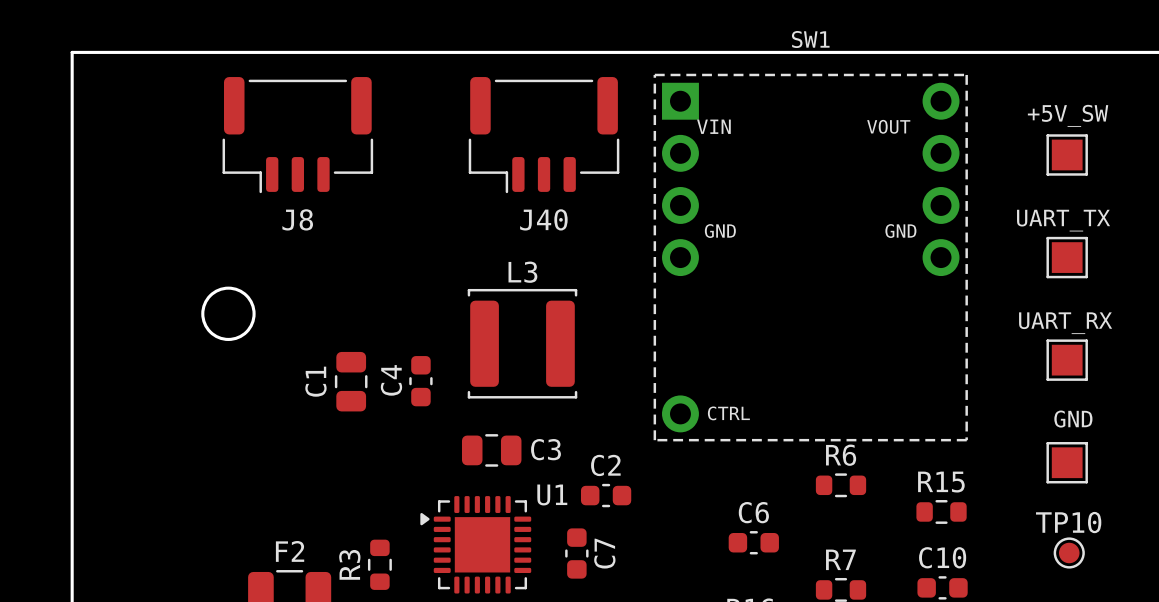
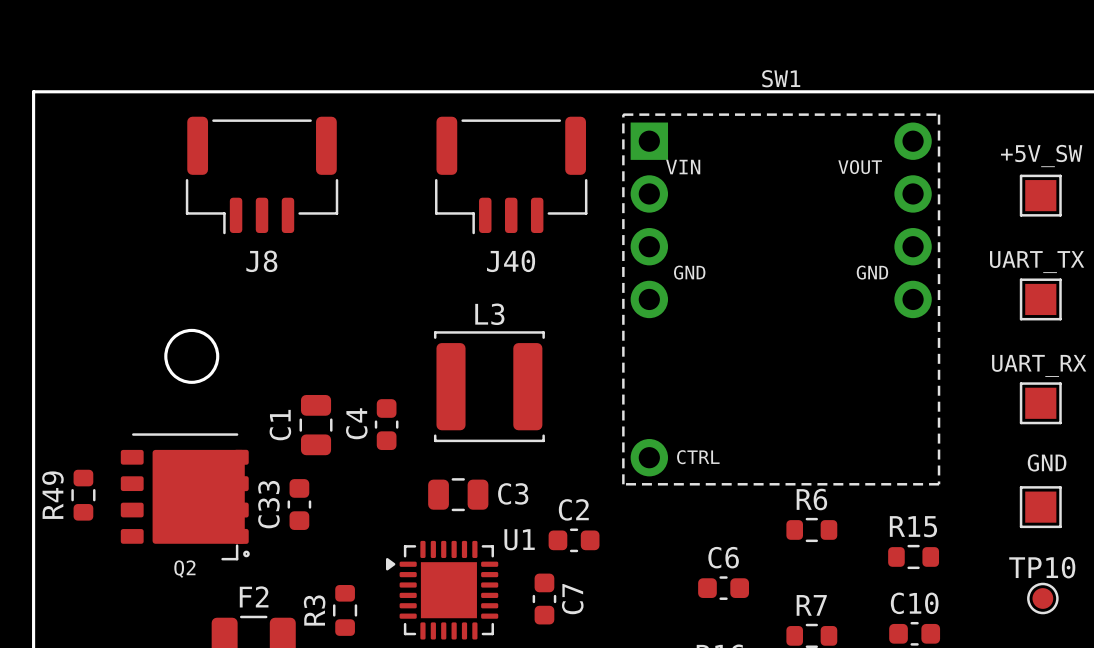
R49: none -> (83, 495)
Q2: none -> (185, 496)
C33: none -> (299, 504)

